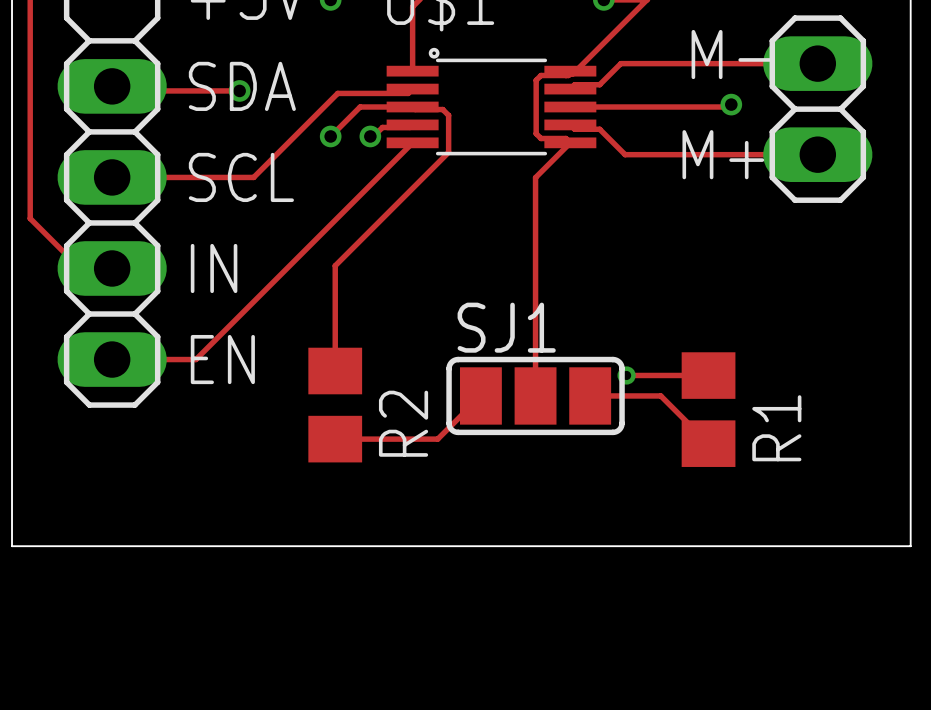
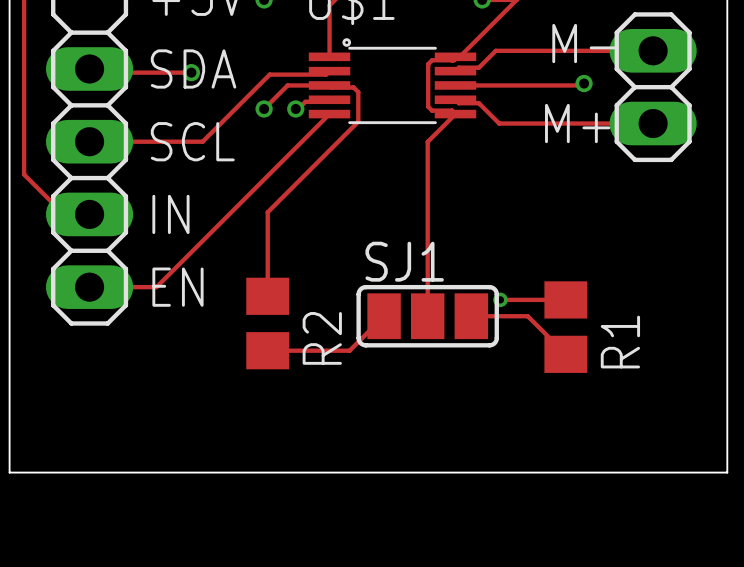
board edge: (12, 546) (910, 546) -> (9, 436) (9, 472) (727, 472) (727, 436)

